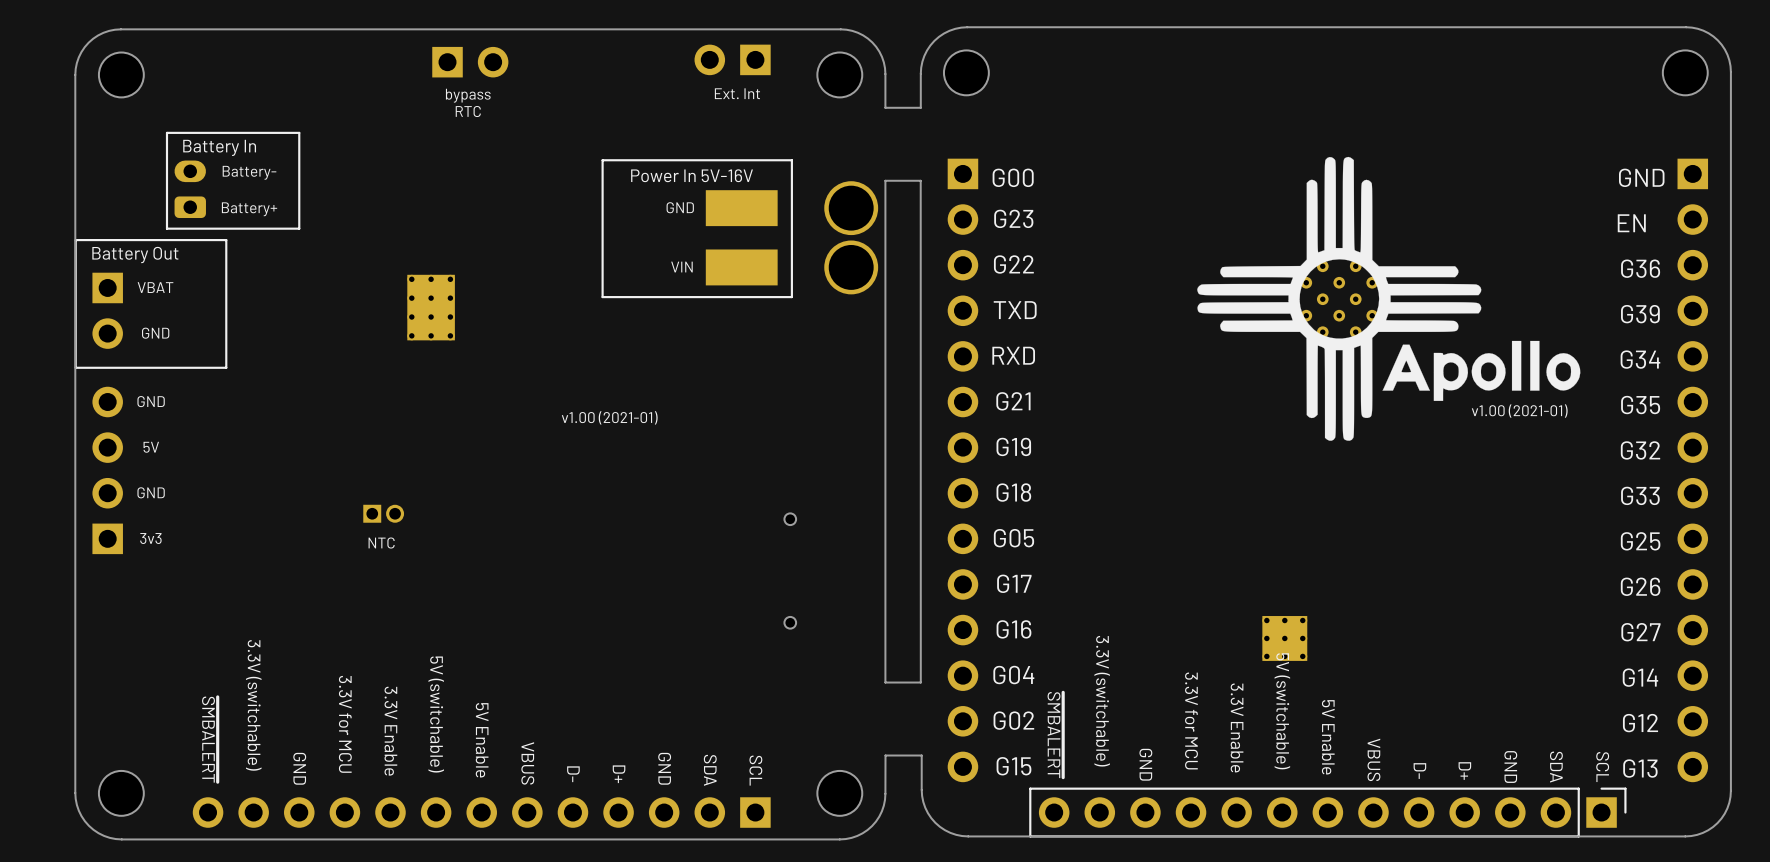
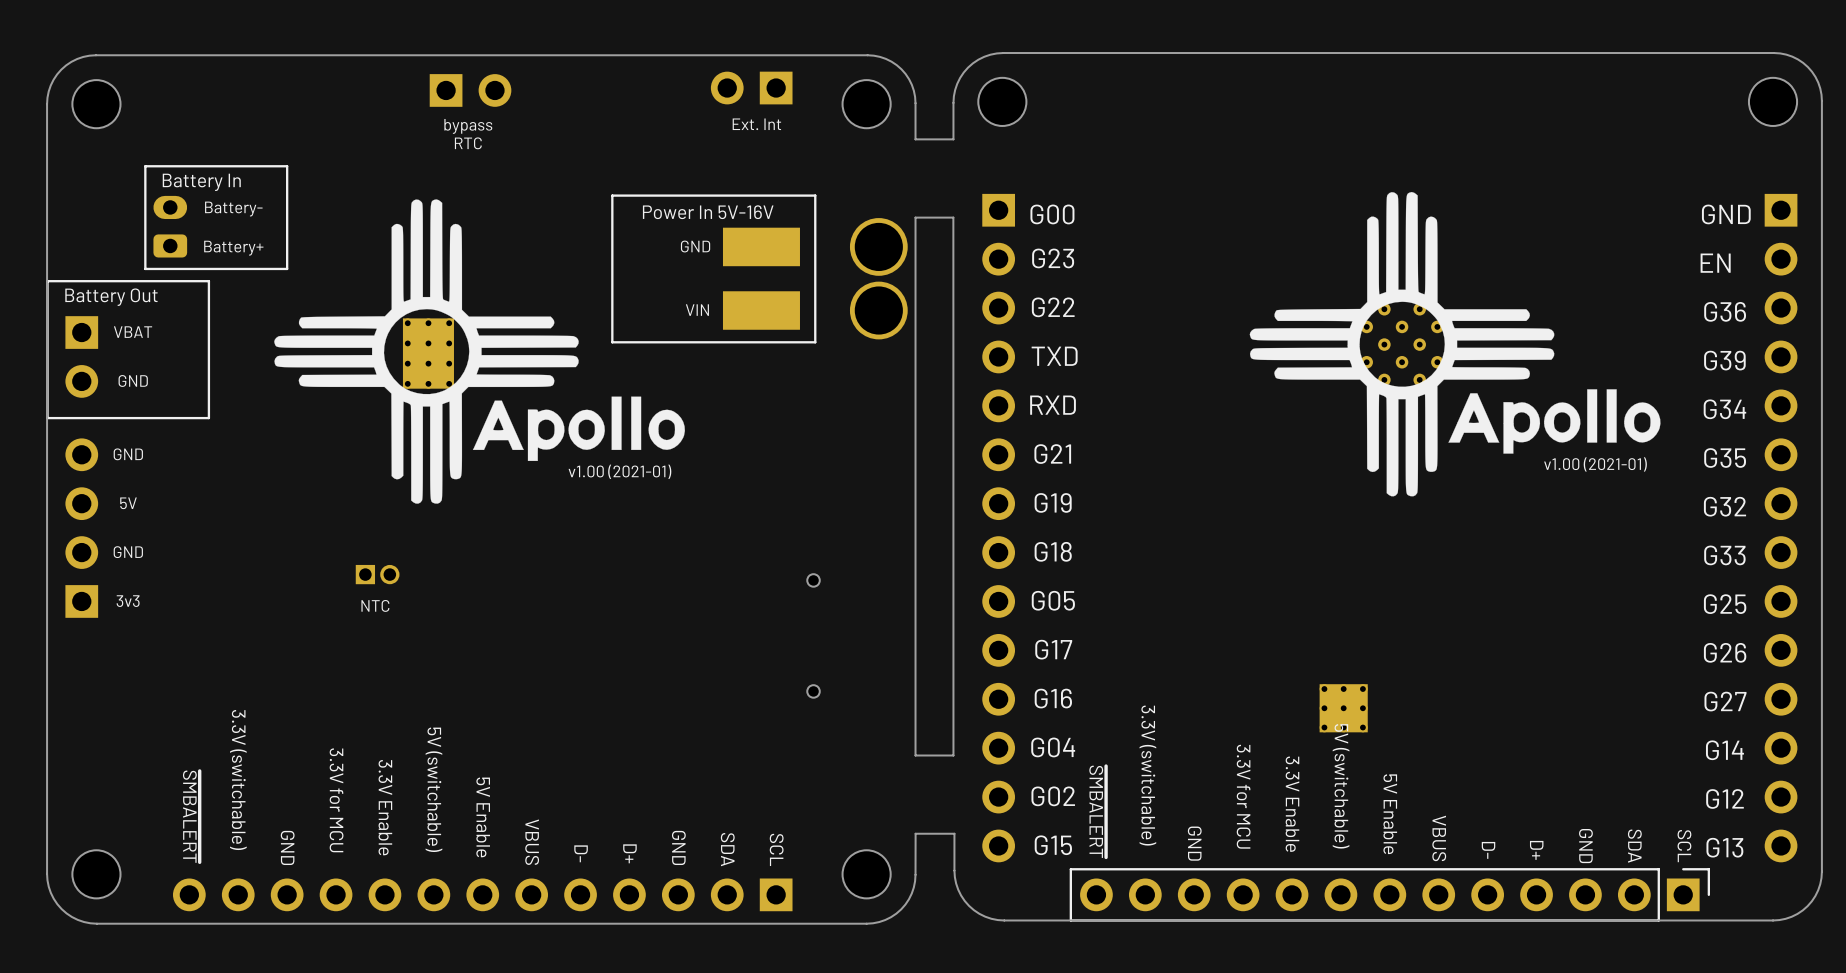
drawing: none -> [274, 199, 685, 504]

